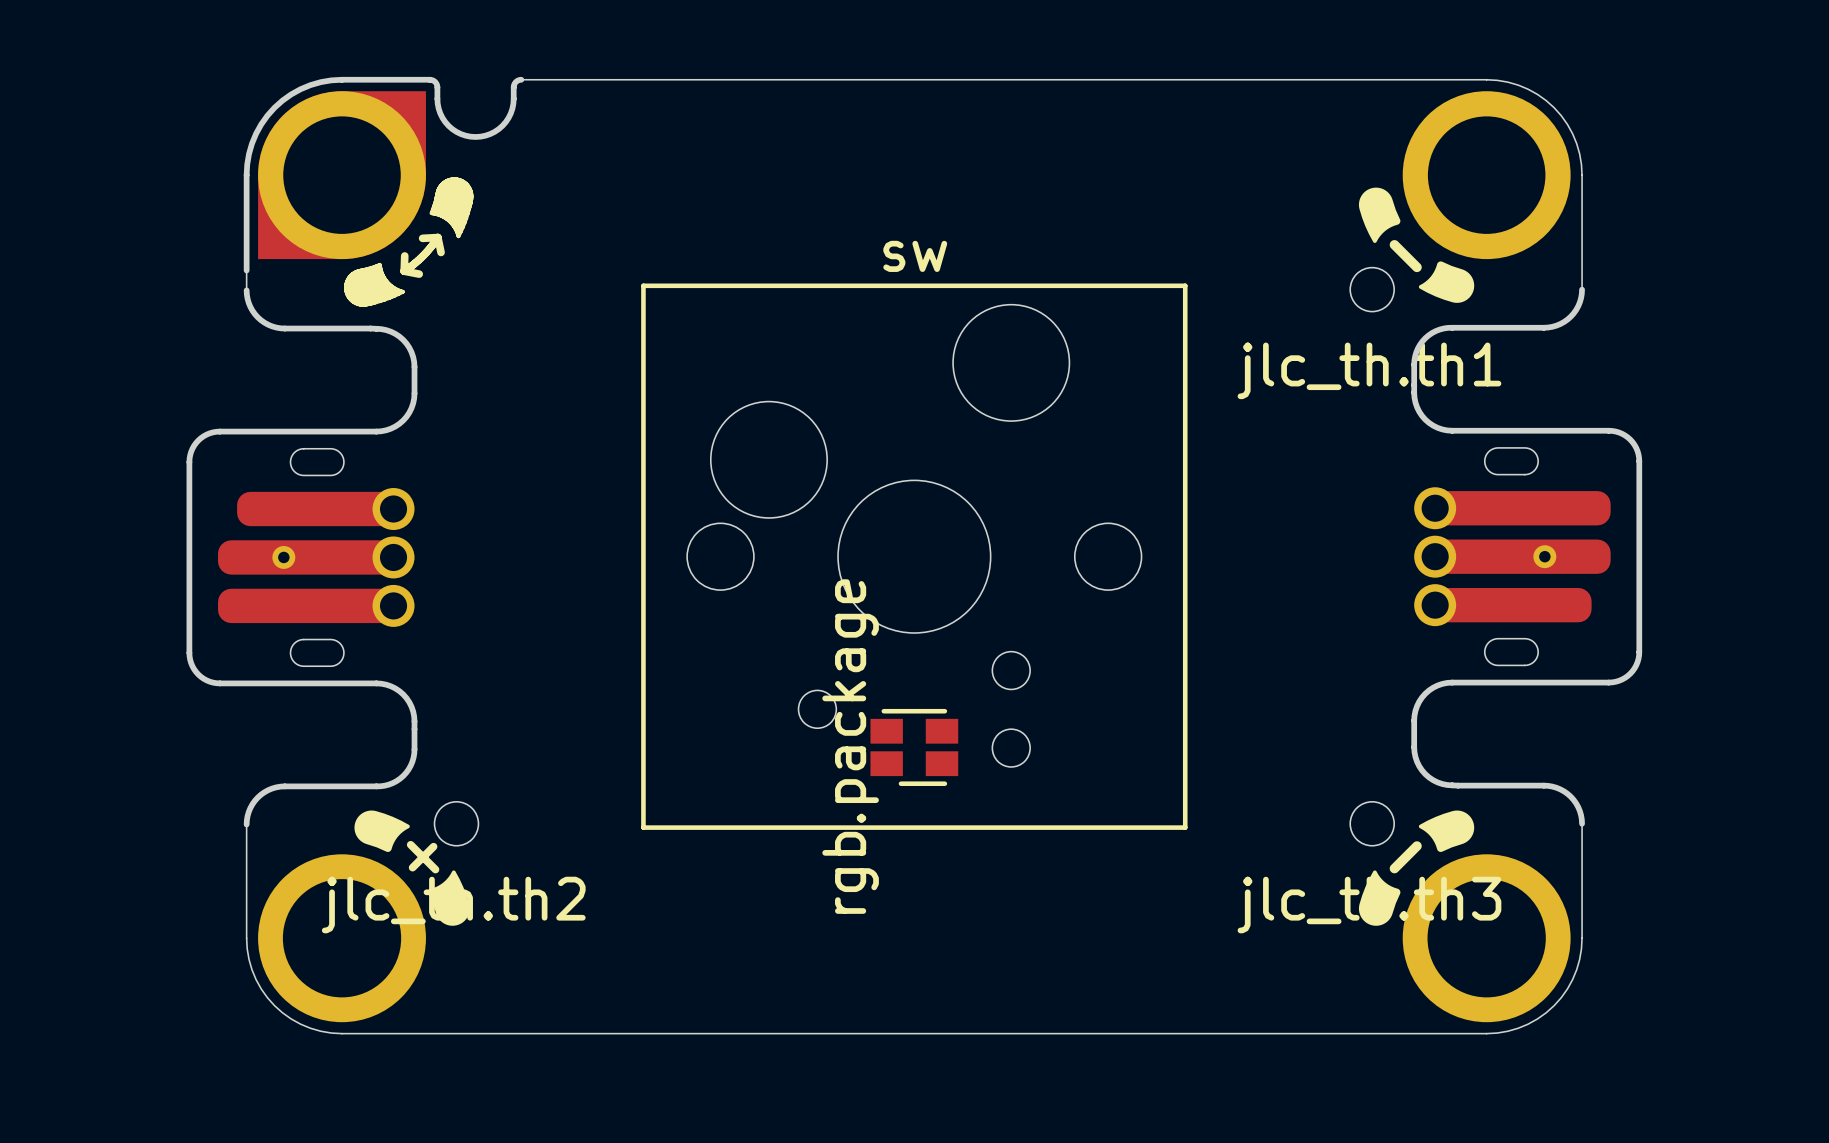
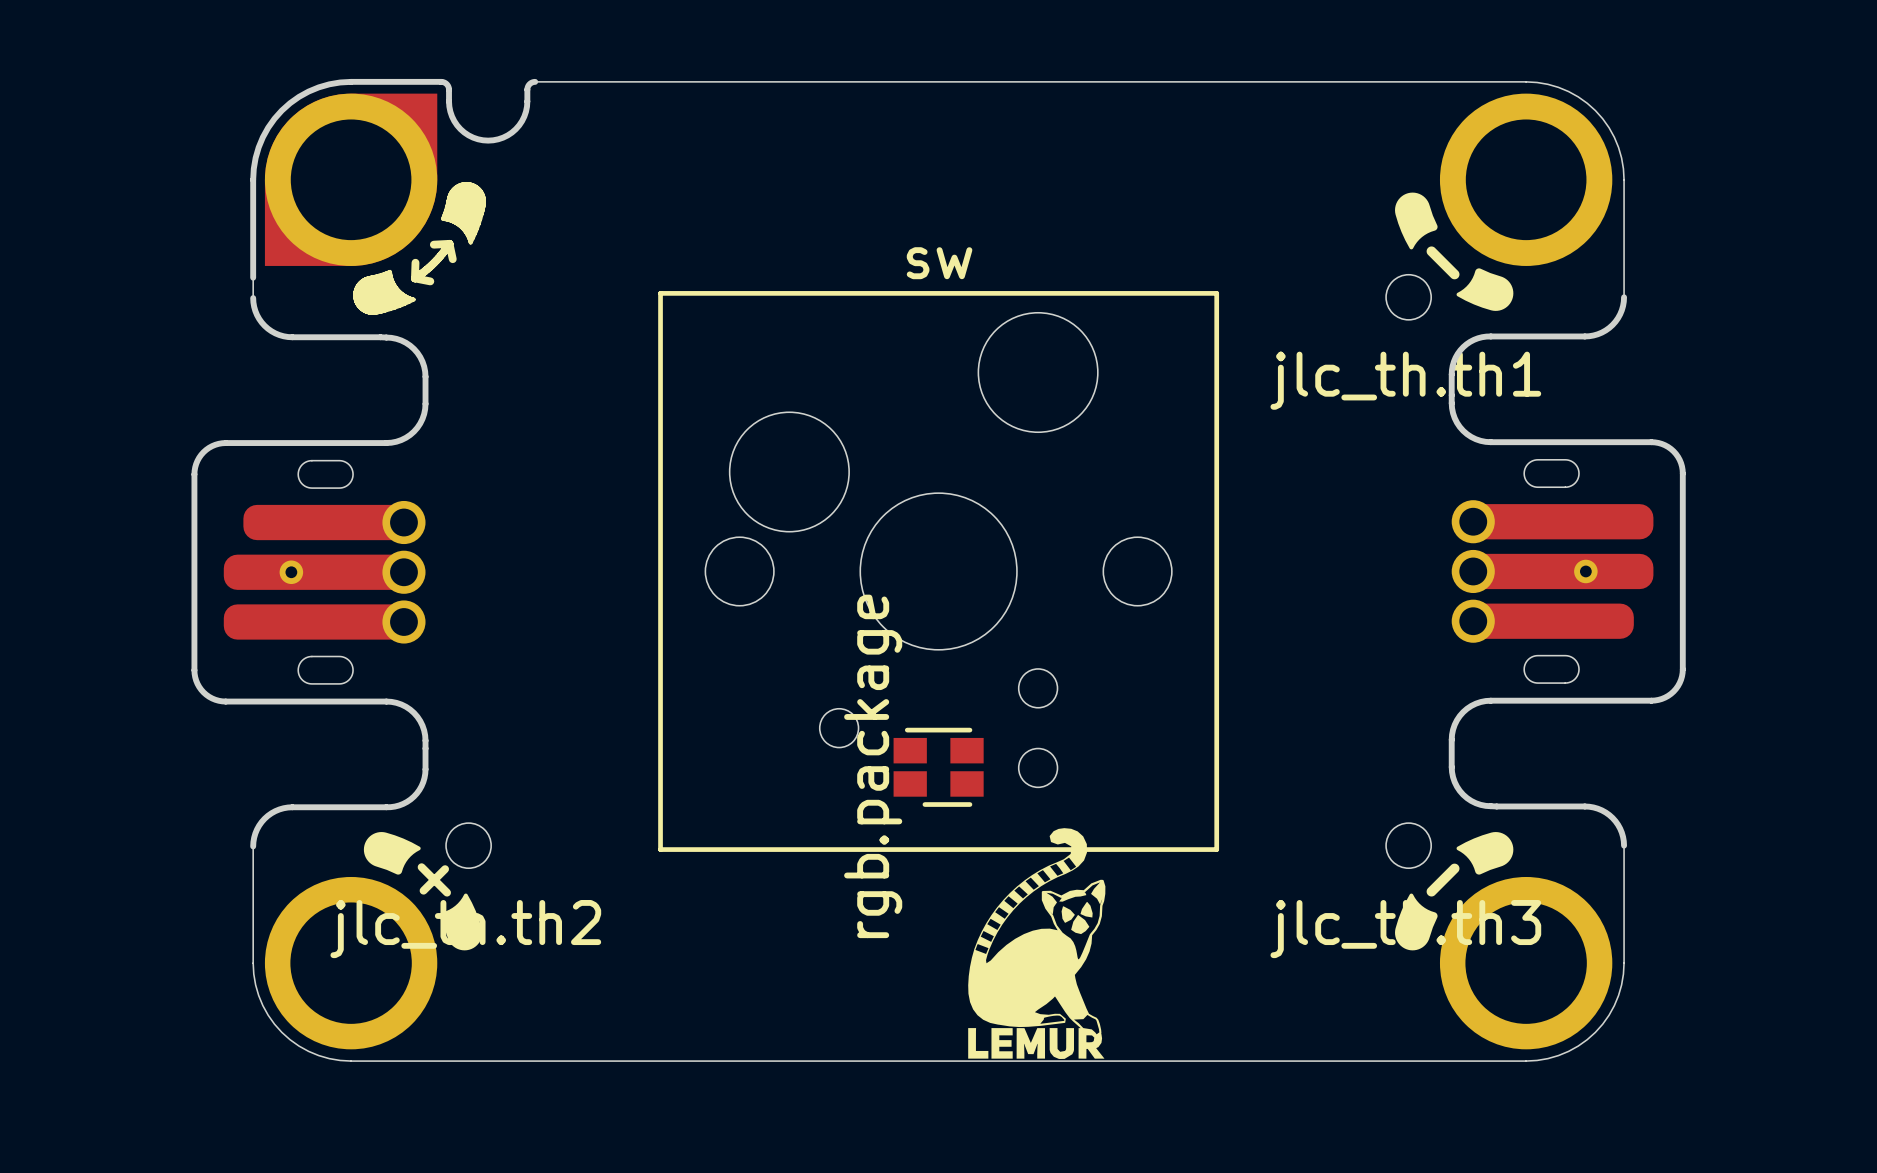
drawing: none -> [968, 828, 1106, 1060]

